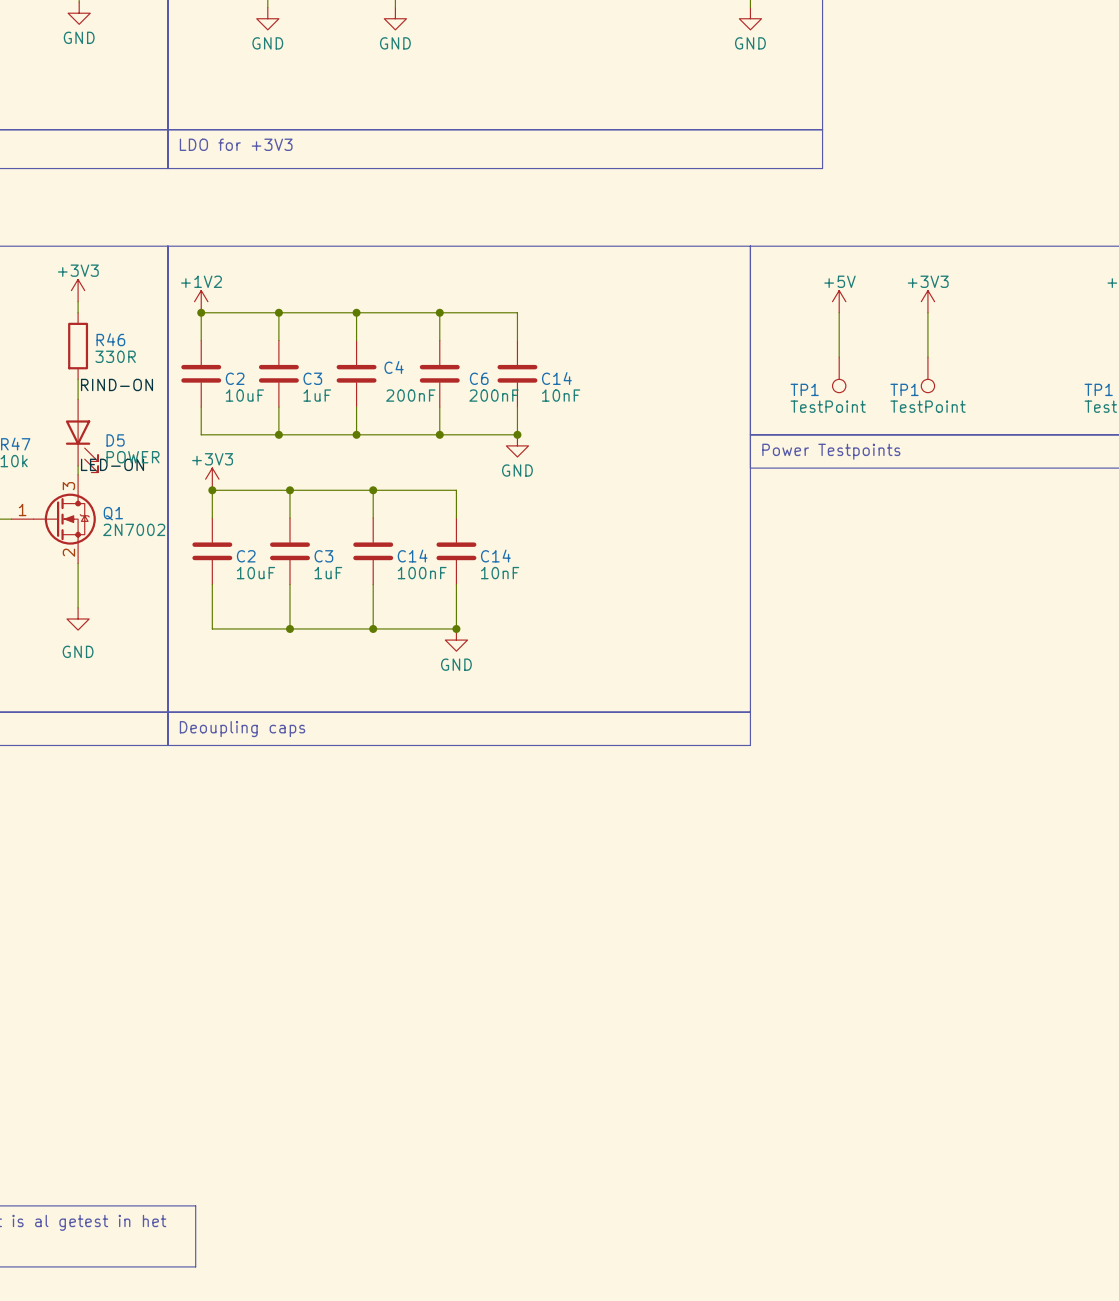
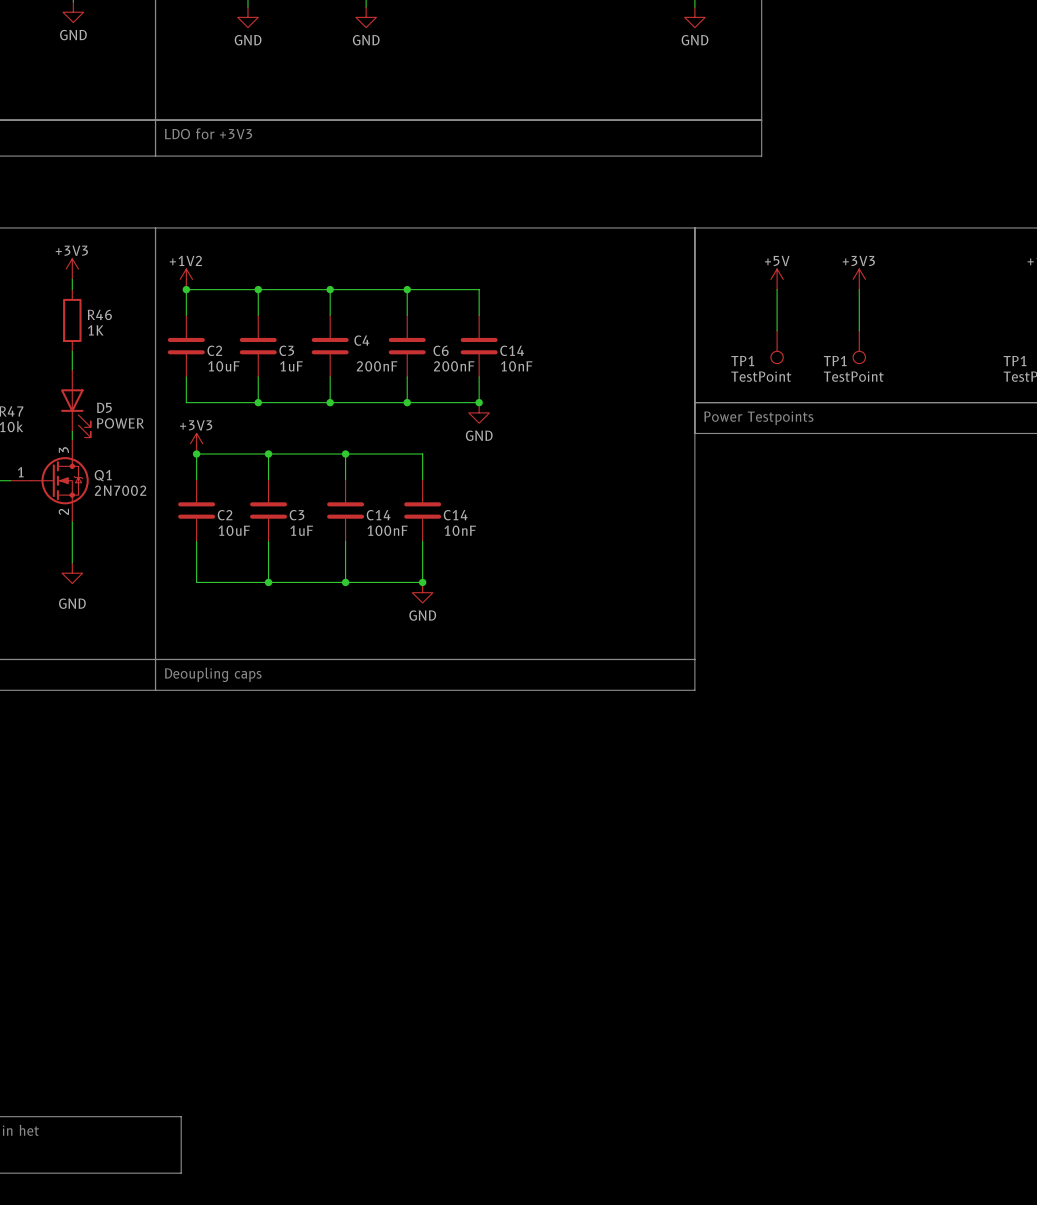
R46 value: 330R (115, 356) -> 1K (95, 330)
label: RIND-ON (116, 384) -> none
label: LED-ON (112, 464) -> none

